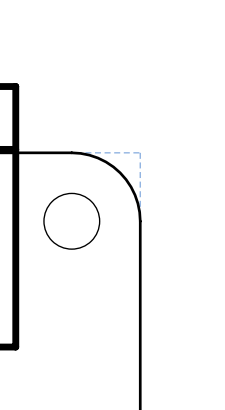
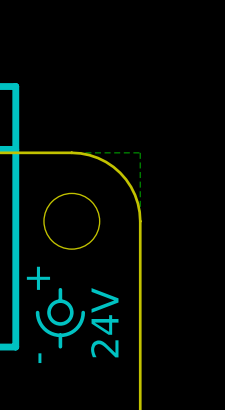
text: none -> + (38, 278)
line: none -> (60, 289) (60, 301)
drawing: none -> [47, 299, 74, 326]
line: none -> (37, 312) (39, 321) (44, 328) (51, 333) (60, 335) (60, 346)
line: none -> (83, 312) (81, 321) (76, 328) (69, 333) (60, 335)
text: none -> 24V (104, 322)
text: none -> - (39, 358)

